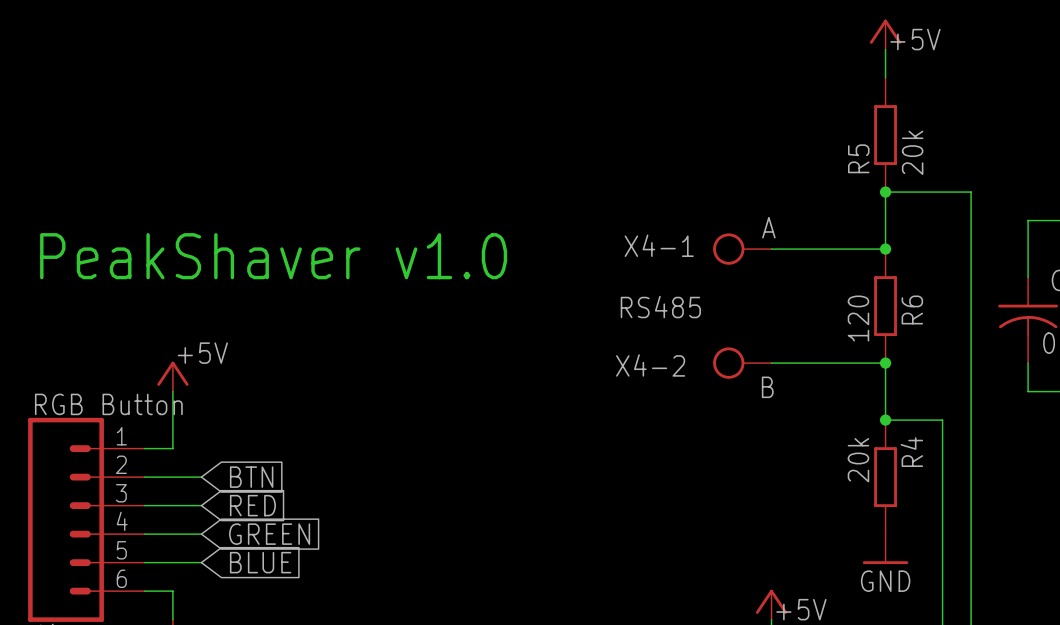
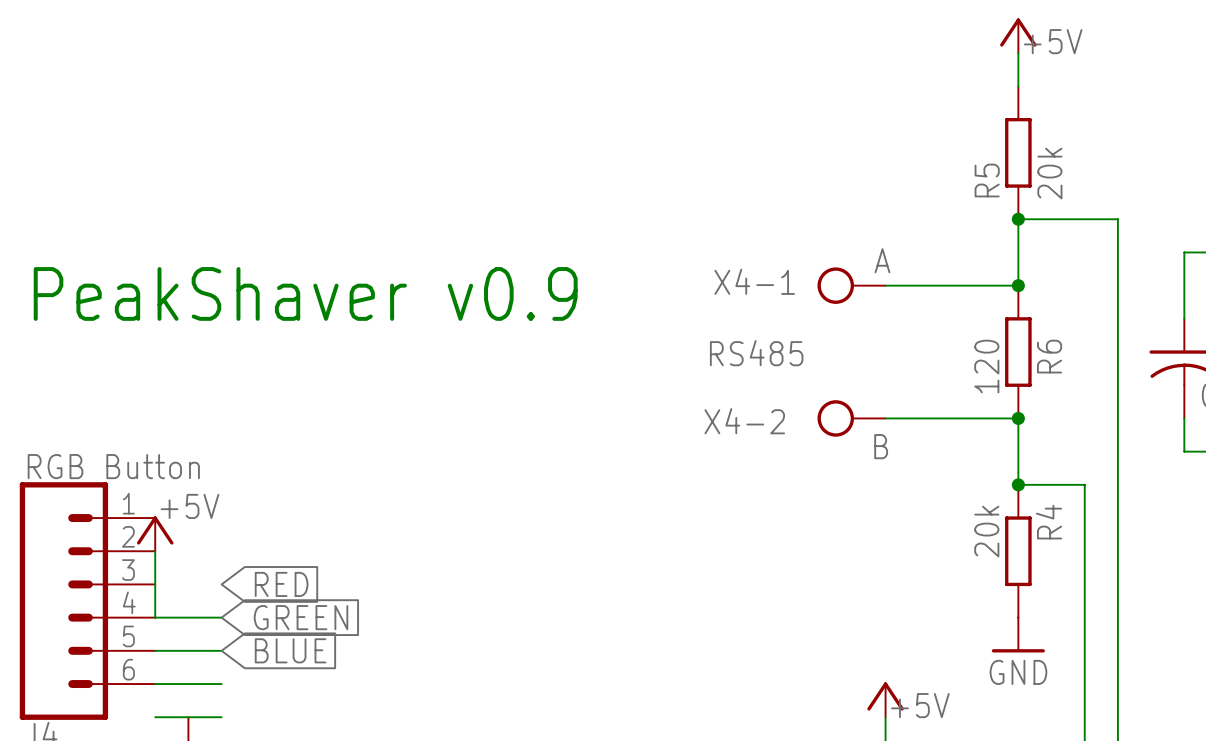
text: PeakShaver v1.0 (273, 256) -> PeakShaver v0.9 (305, 293)
power symbol position: +5V (172, 376) -> +5V (155, 533)
wire: (172, 391) (172, 448) (144, 448) -> none
wire: (144, 477) (201, 477) -> (155, 551) (155, 617)
global label: BTN (251, 477) -> none
wire: (144, 505) (201, 505) -> (155, 717) (221, 717)
wire: (172, 591) (172, 619) -> (188, 684) (221, 684)

